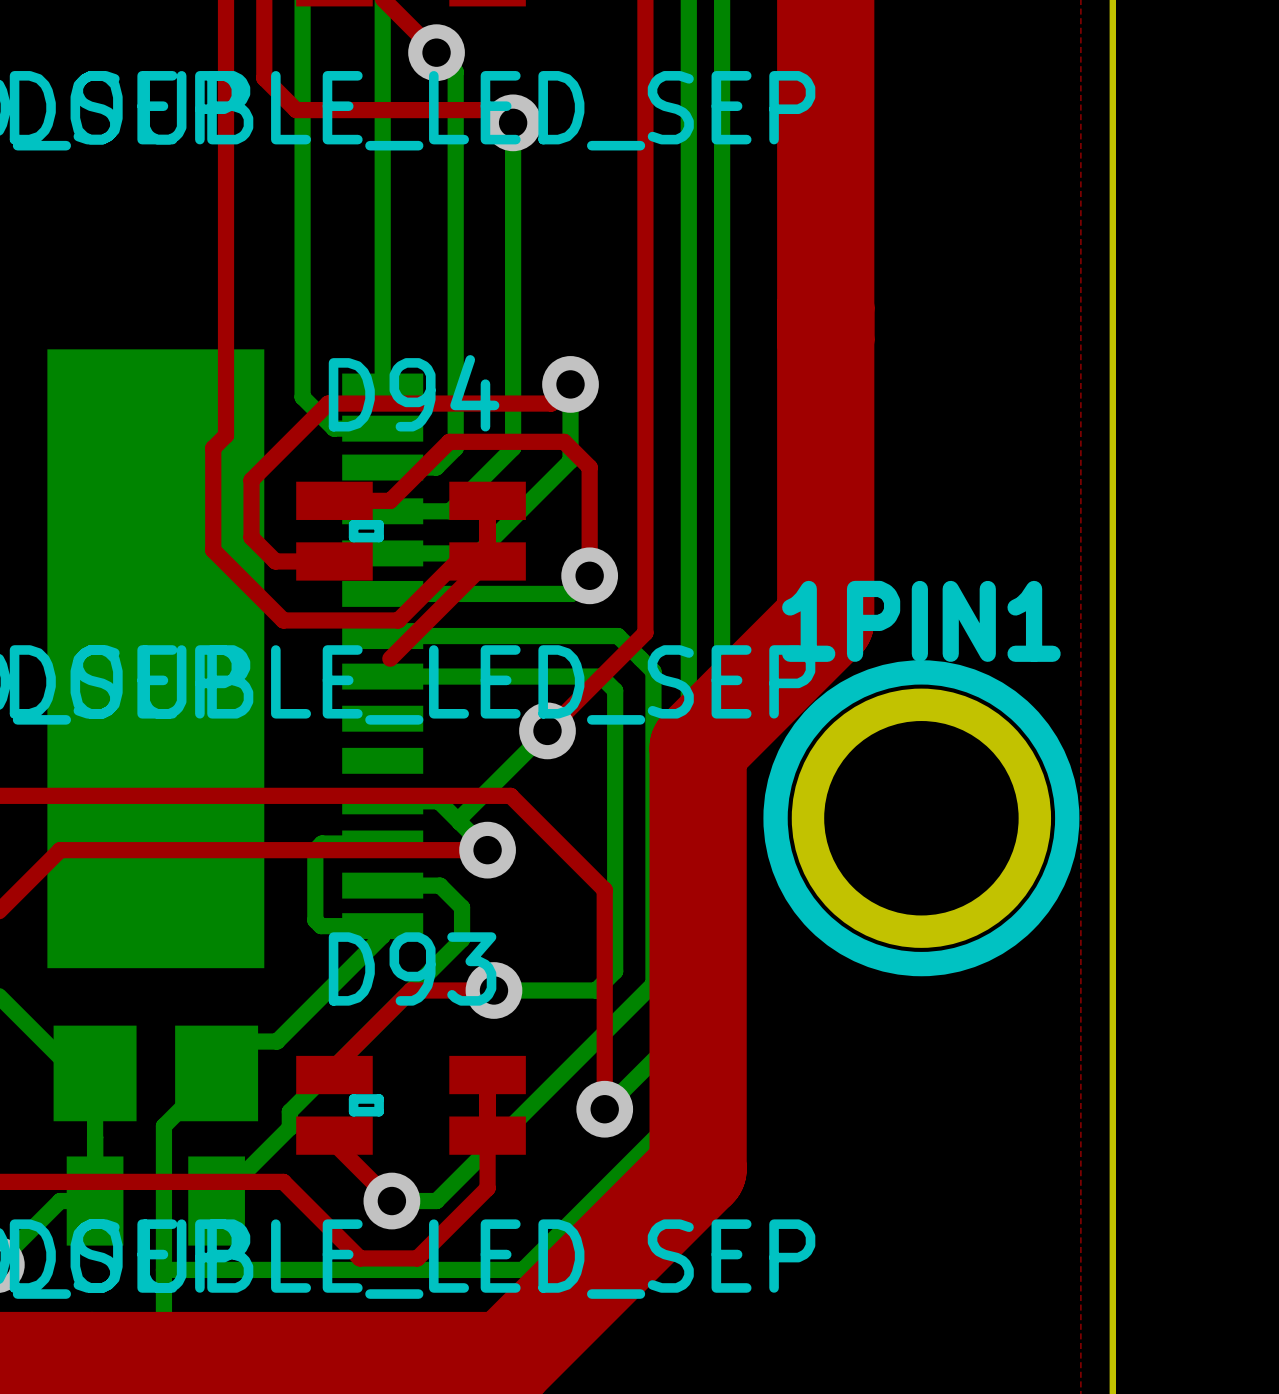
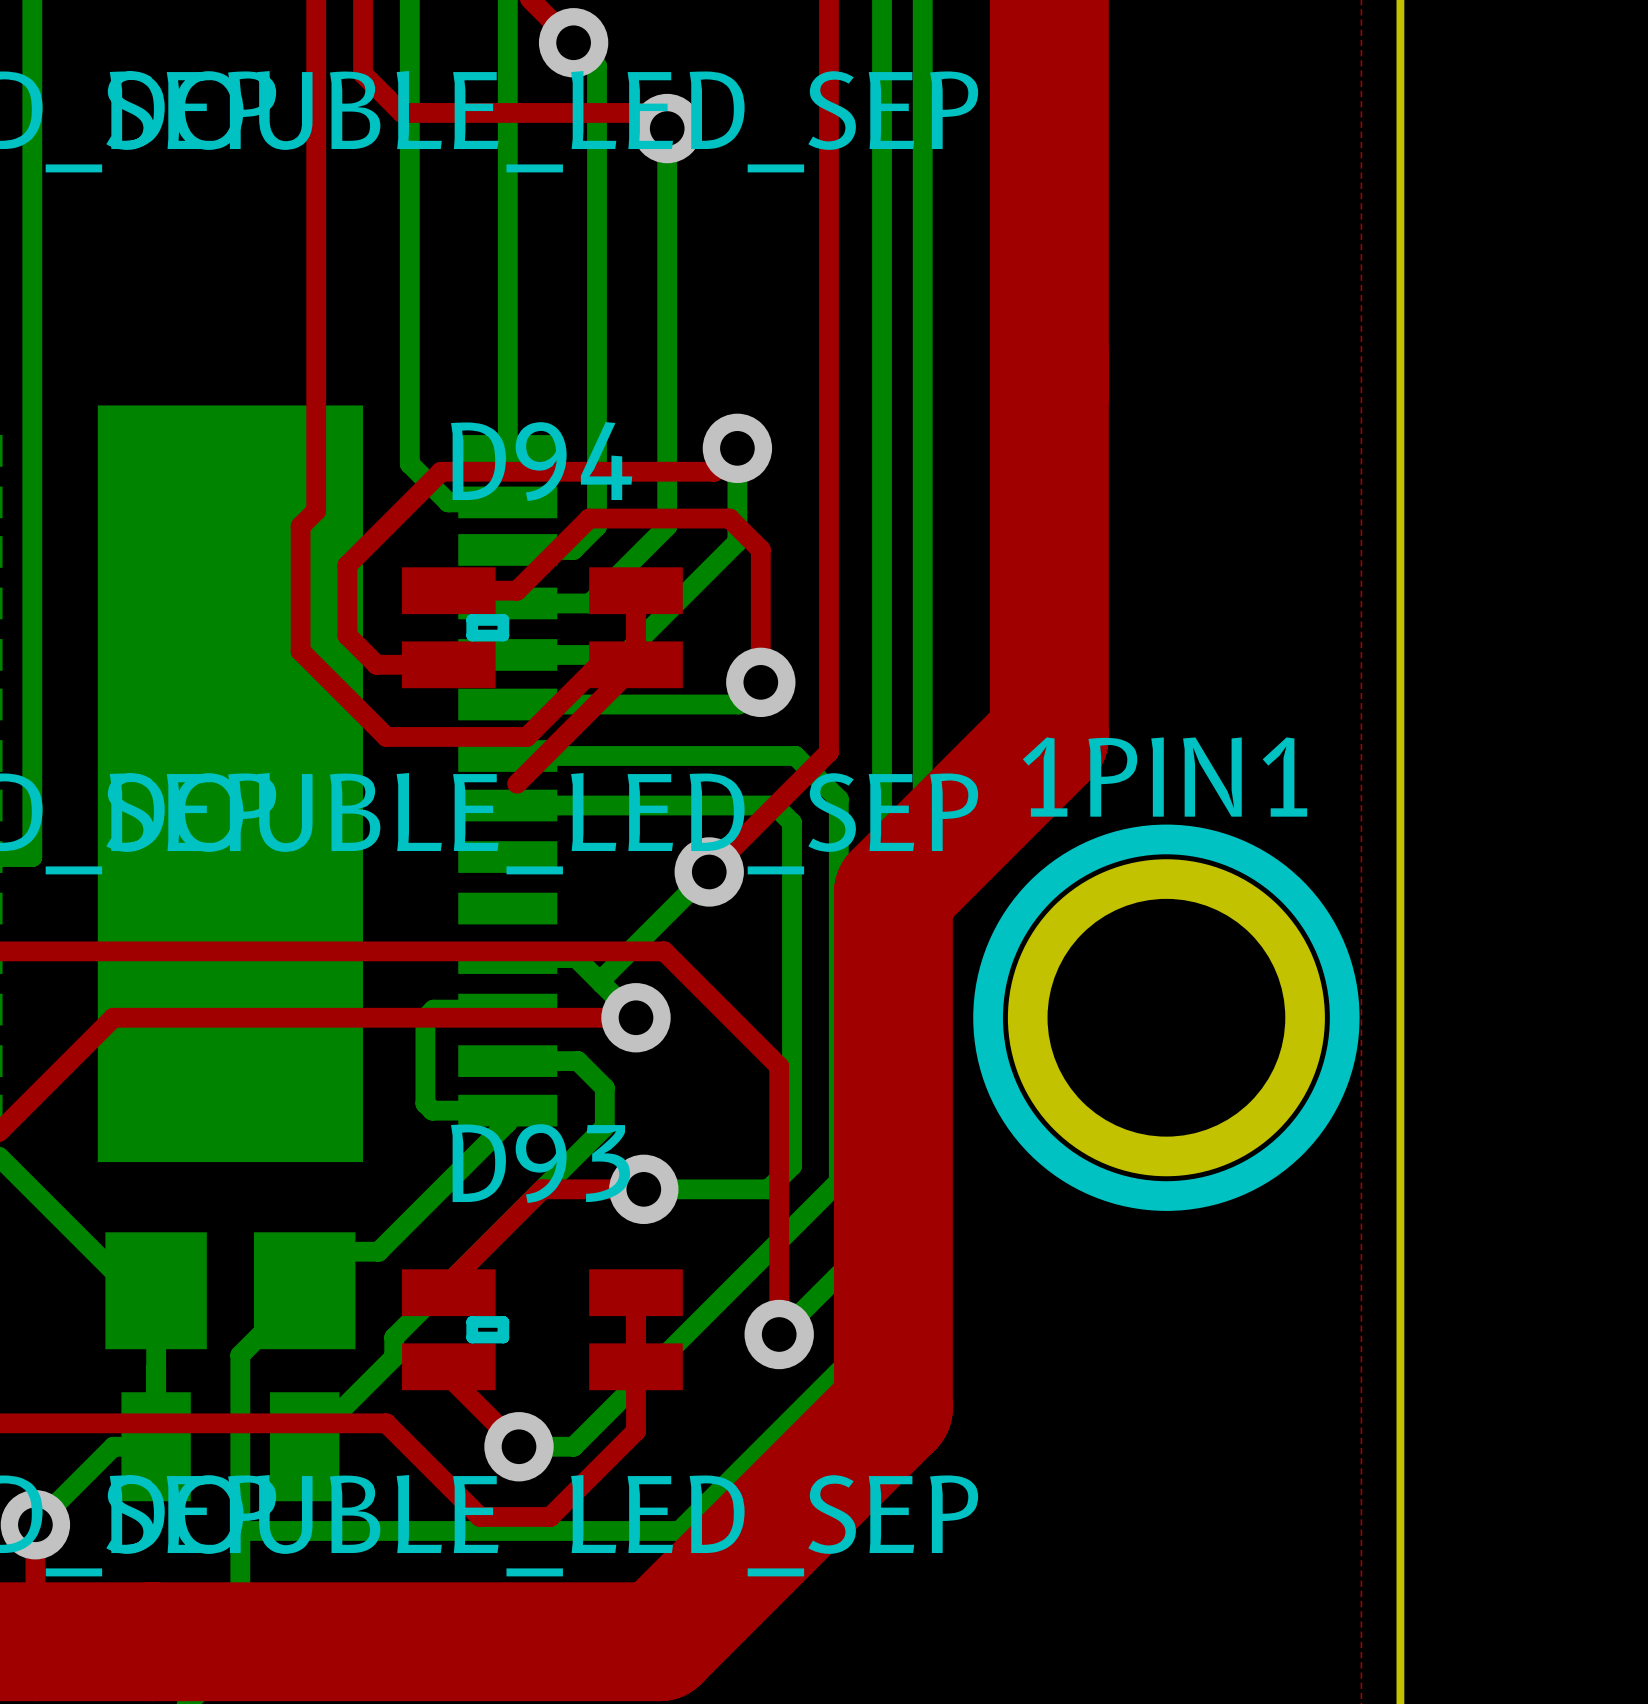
1PIN1 position: (921, 818) -> (1166, 1017)

